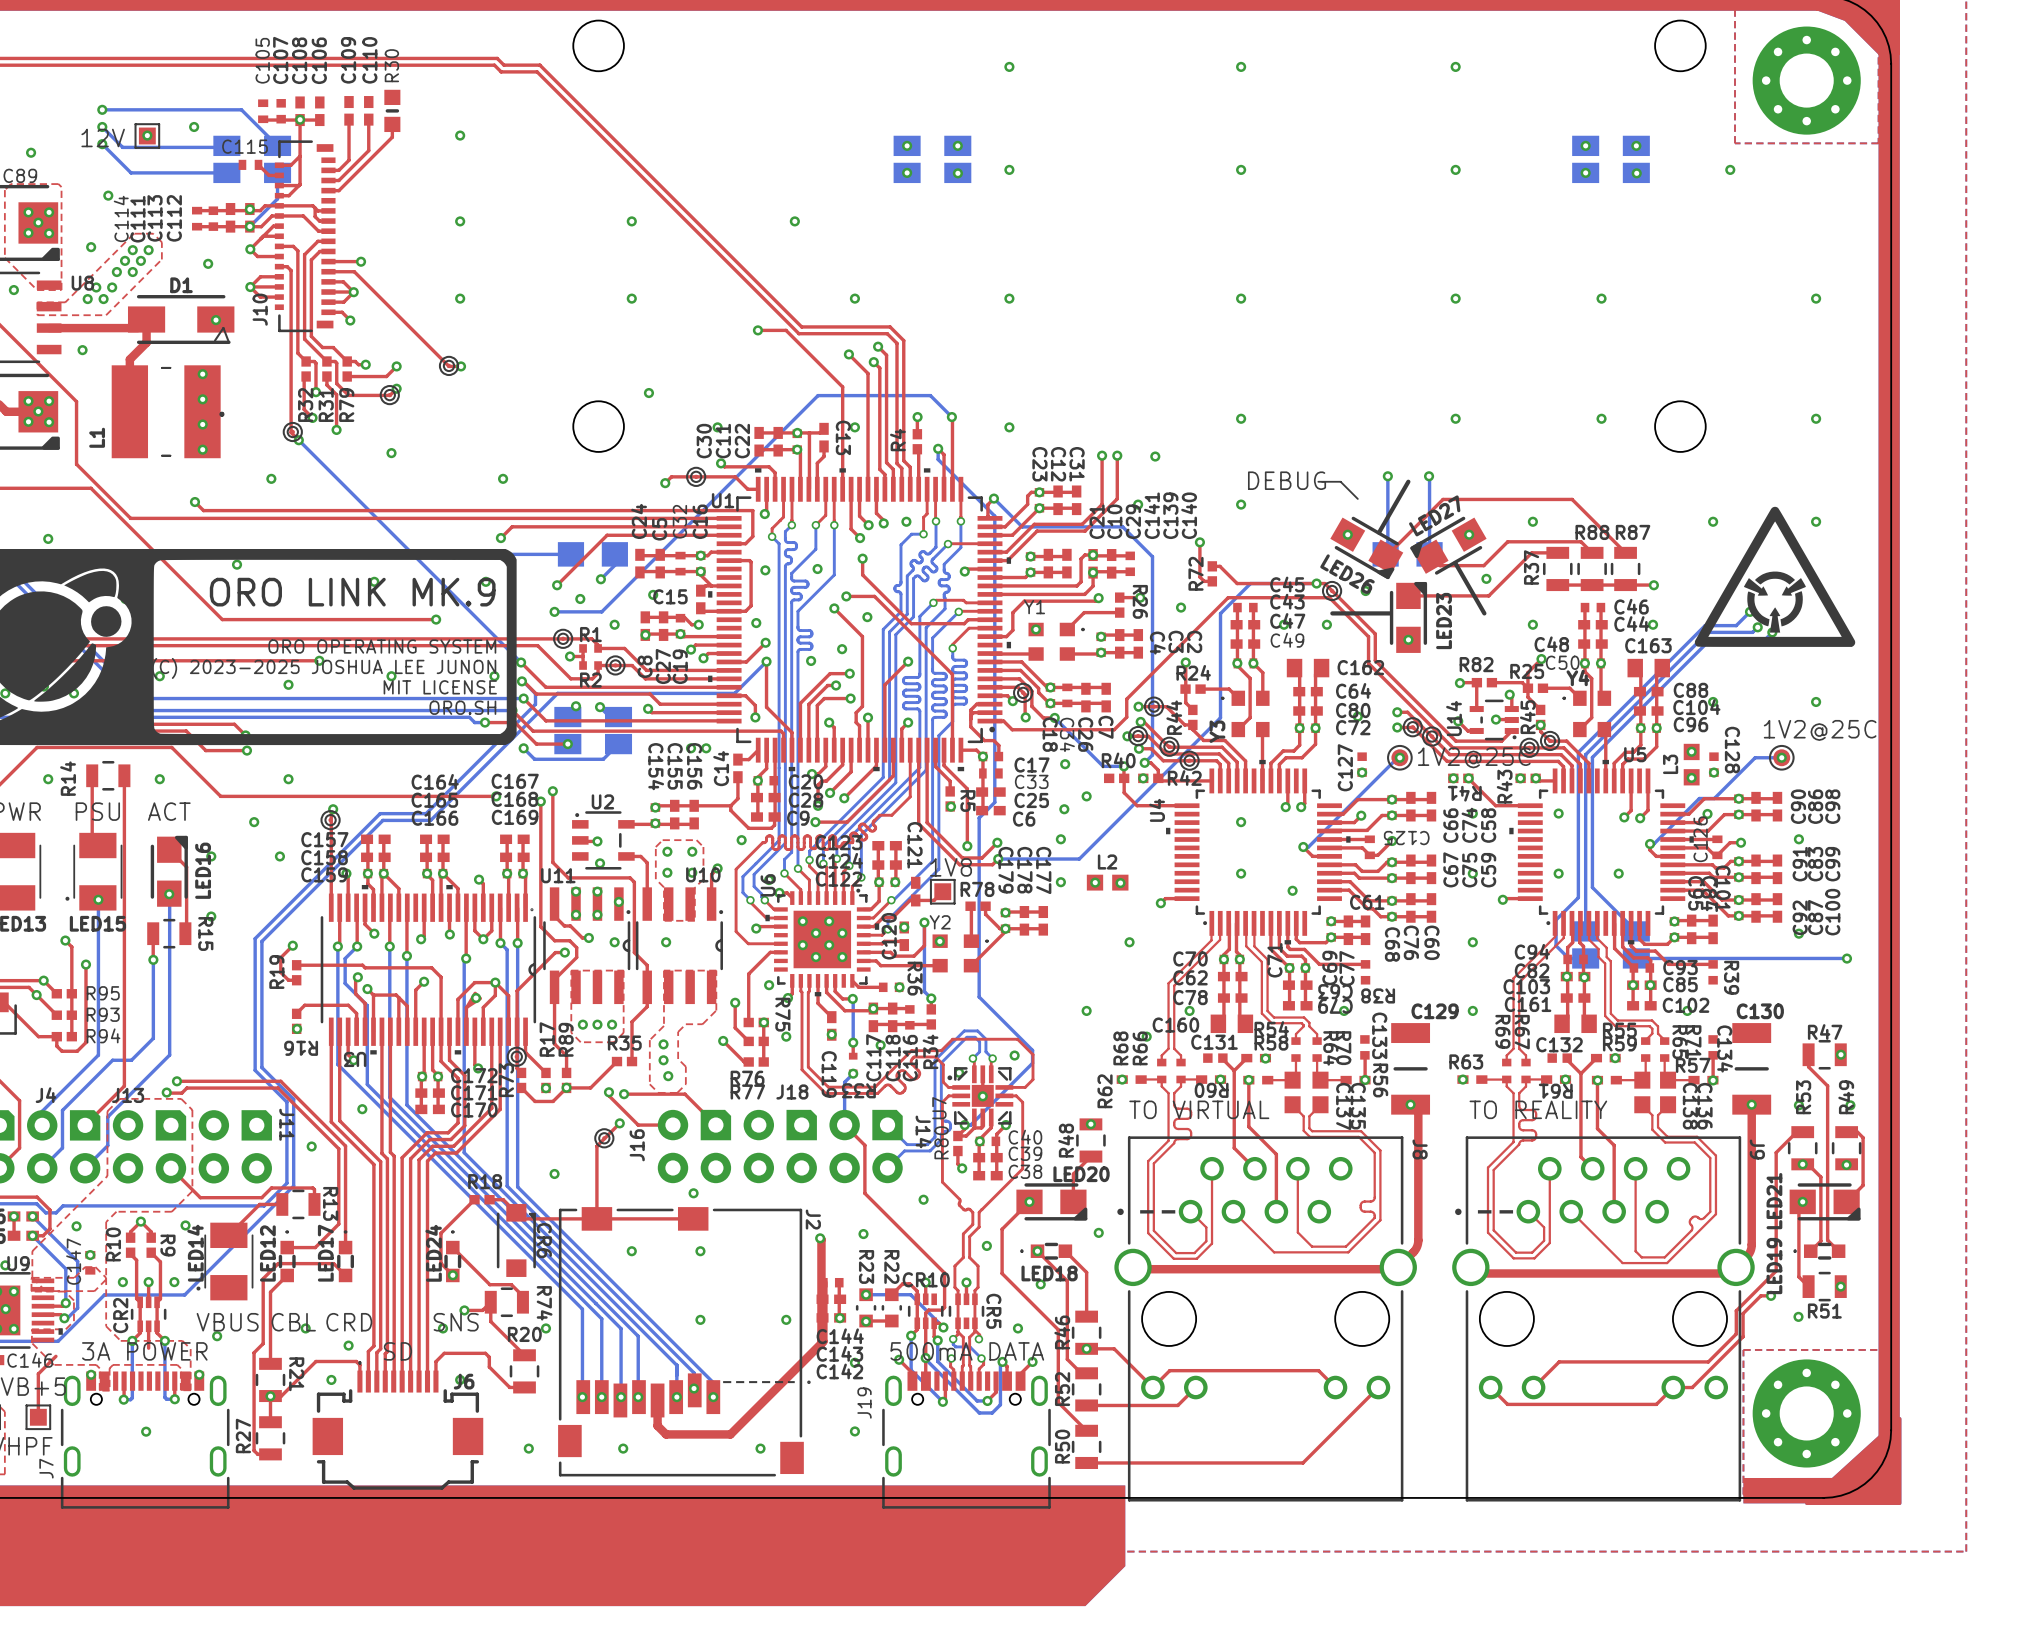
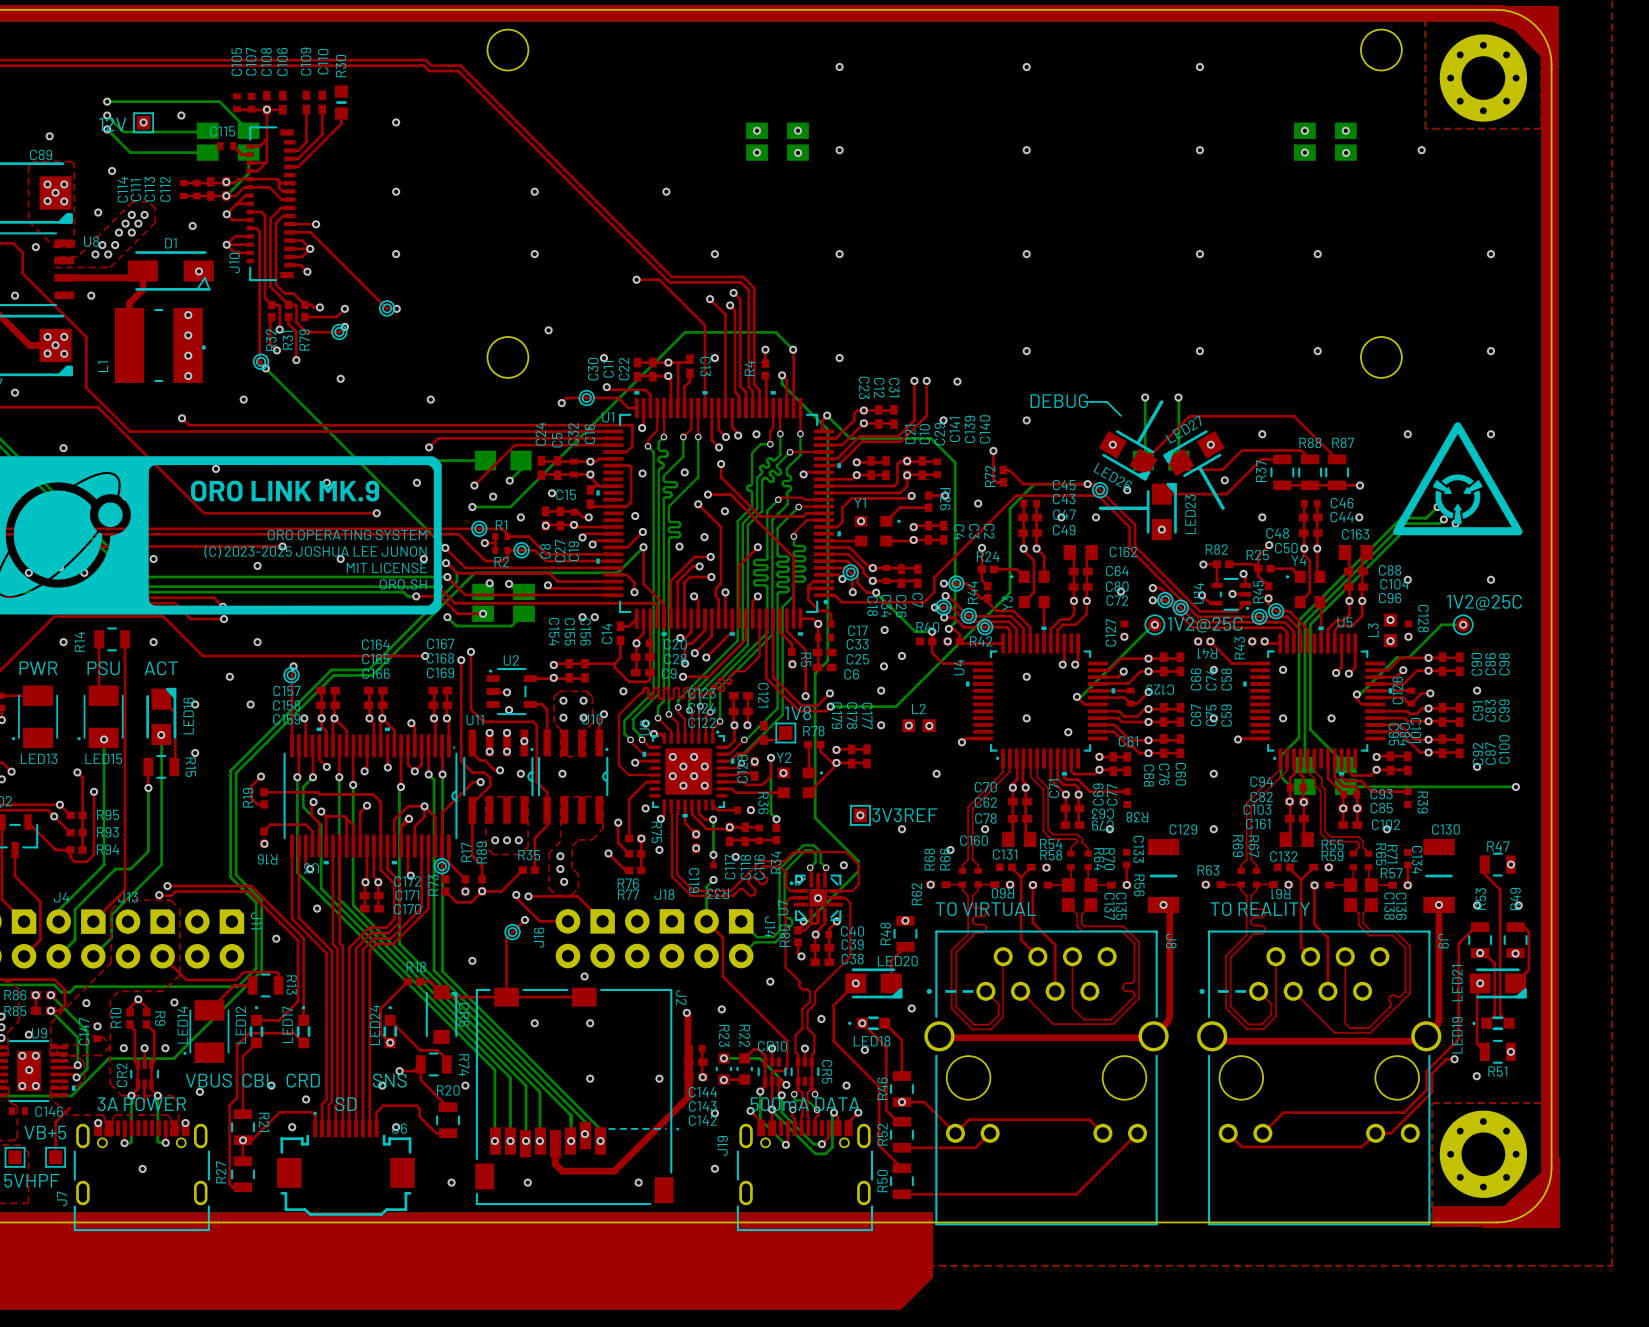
part: none -> (860, 815)
via: none -> (860, 815)
text: none -> 3V3REF (904, 815)
via: none -> (696, 834)

